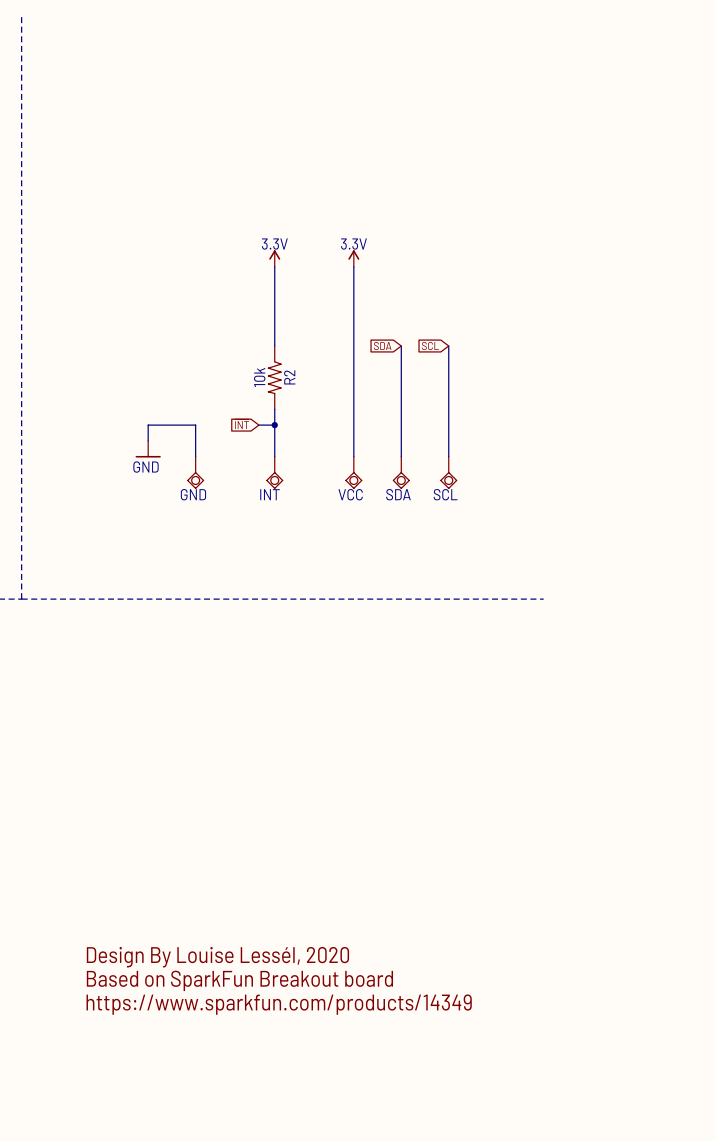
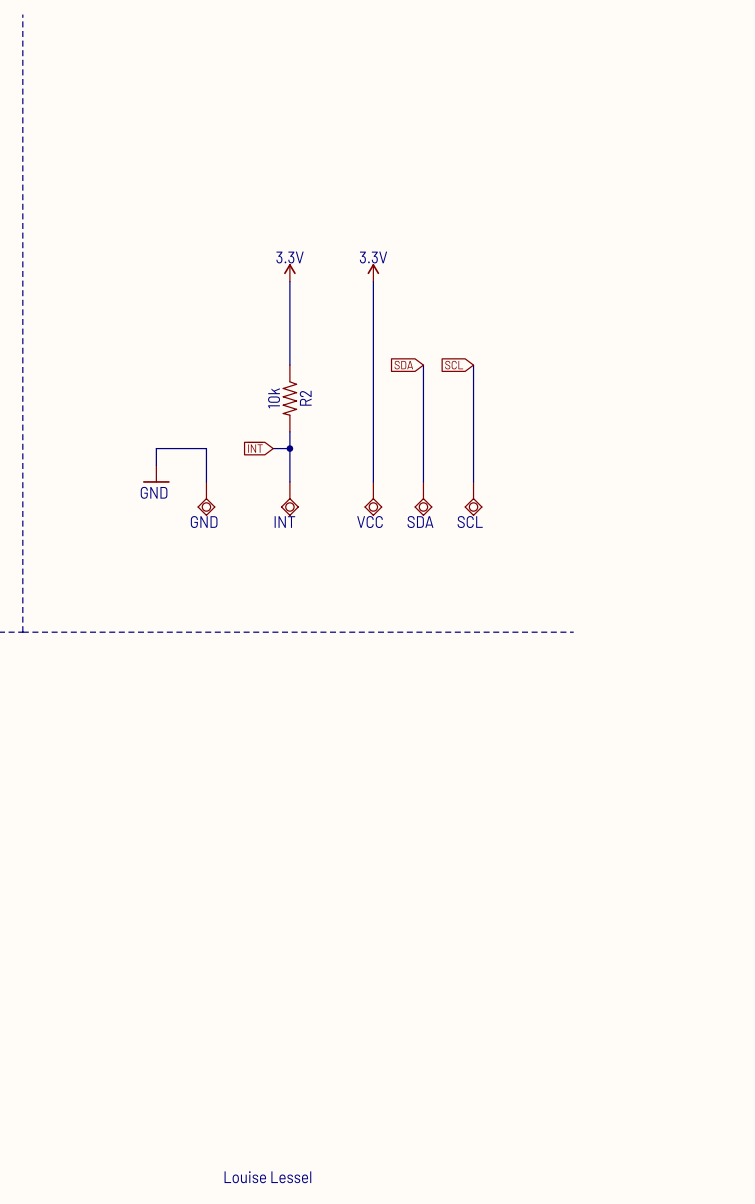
text: Design By Louise Lessél, 2020 (217, 957) -> none
text: Based on SparkFun Breakout board (239, 980) -> none
text: https://www.sparkfun.com/products/14349 (279, 1004) -> none
text: none -> Louise Lessel (267, 1177)

